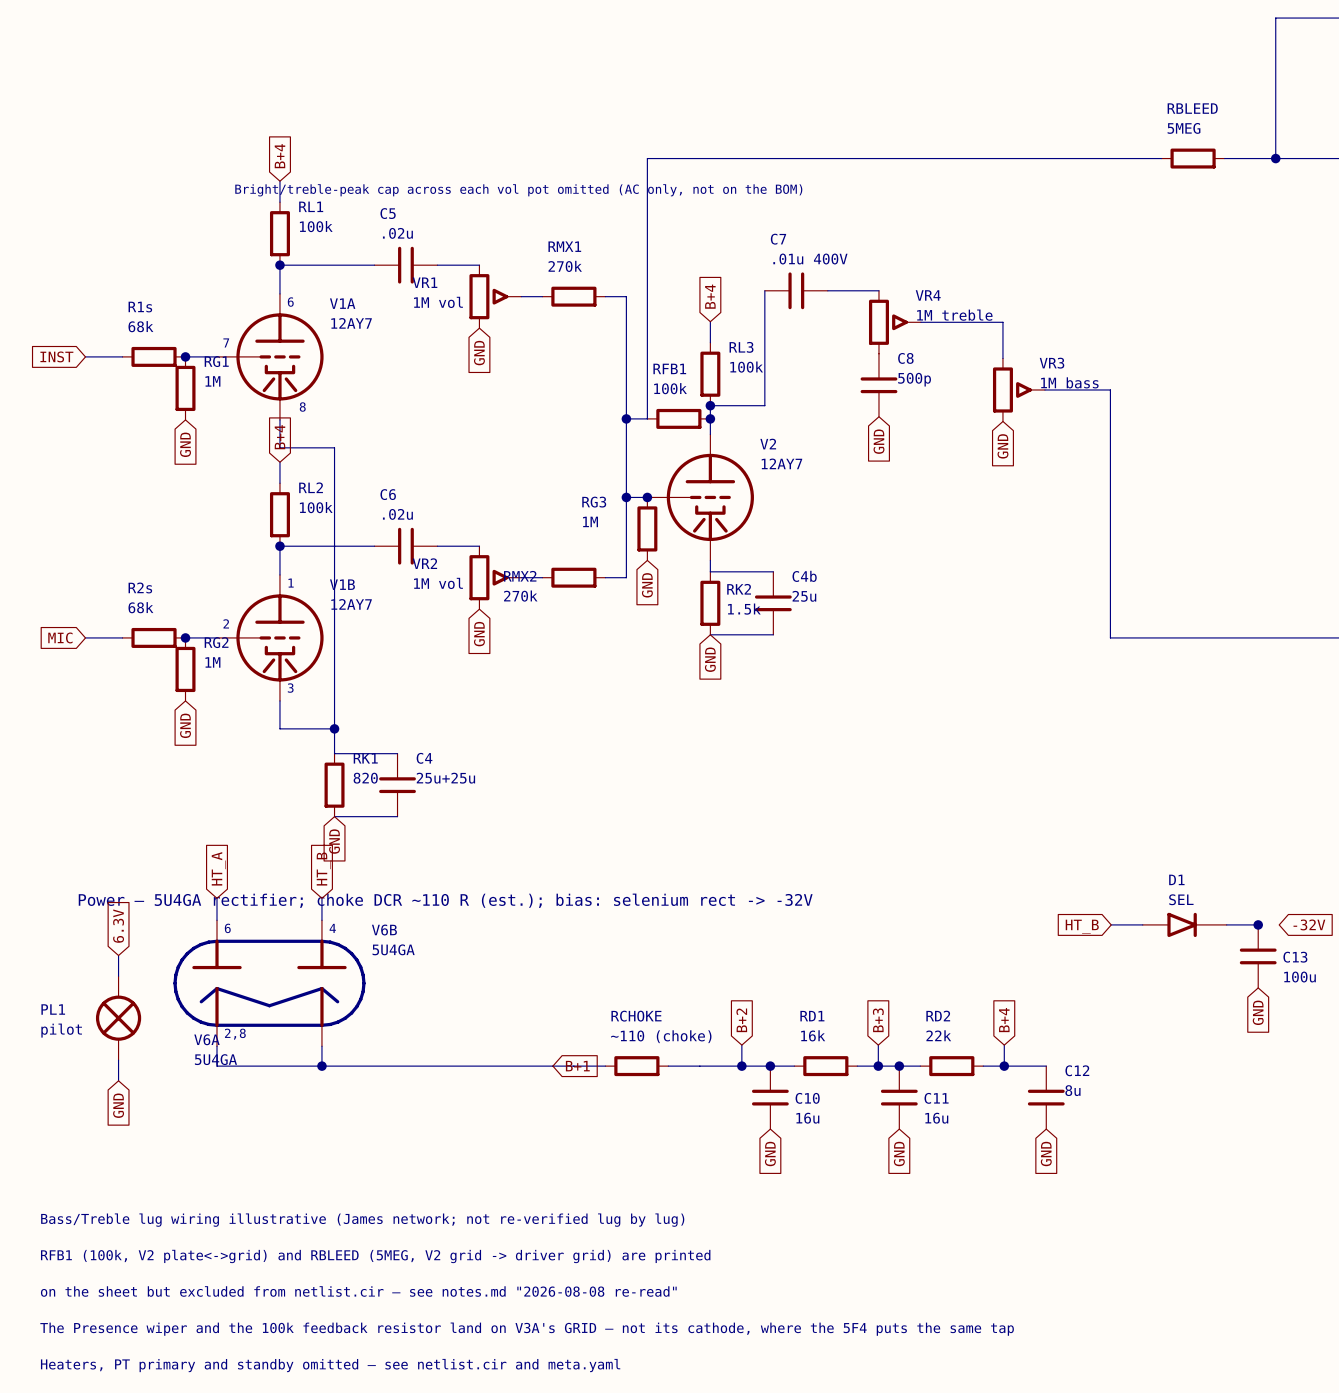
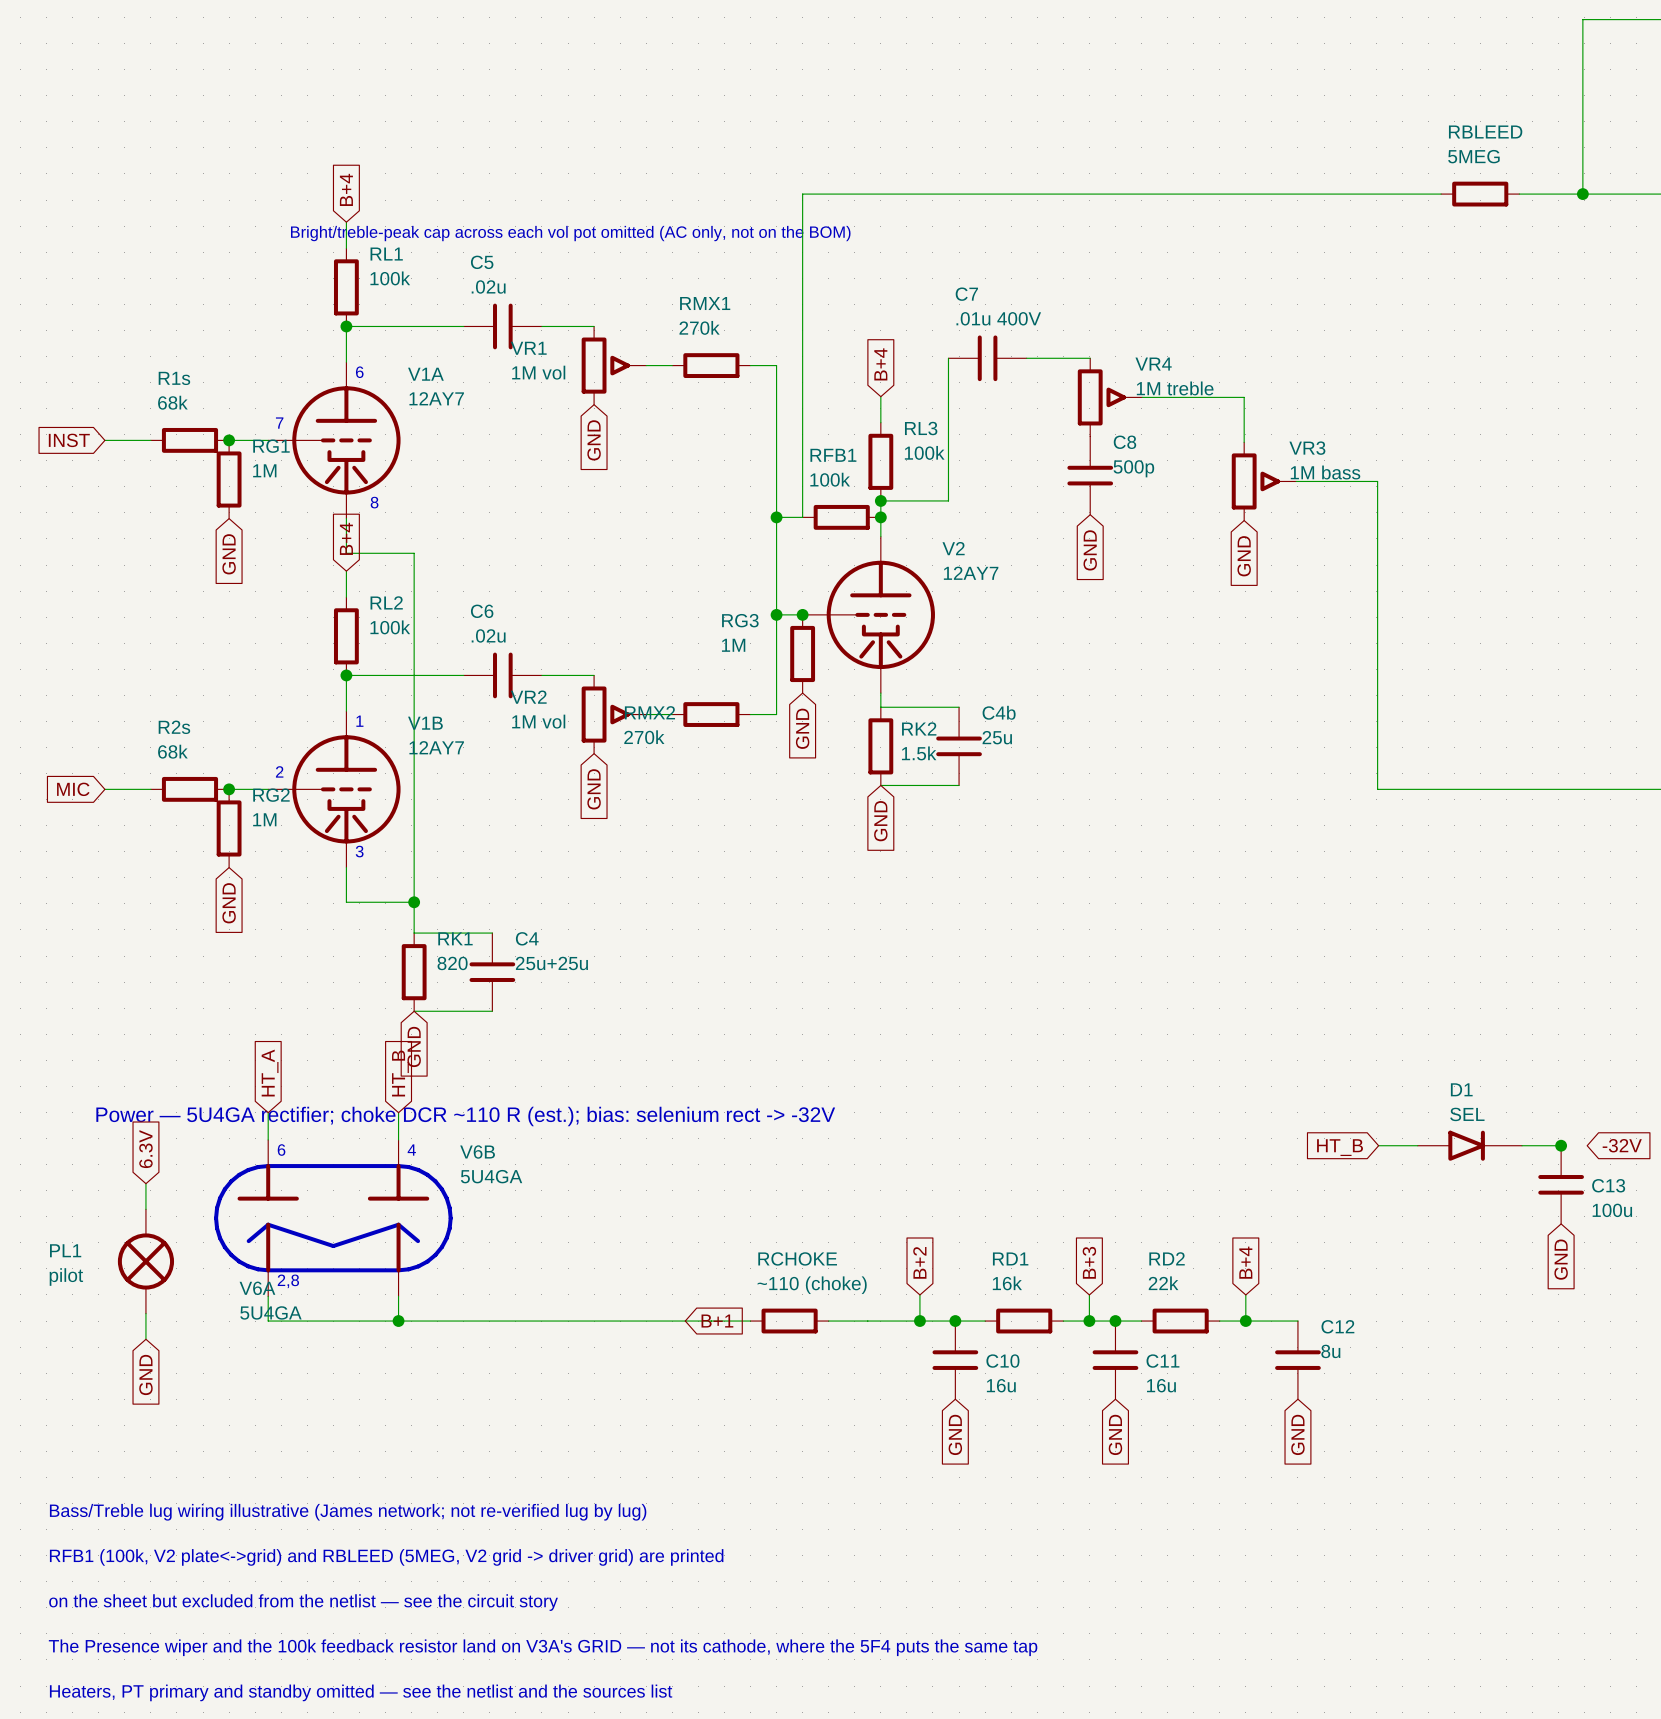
text: on the sheet but excluded from netlist.cir — see notes.md "2026-08-08 re-read" (358, 1291) -> on the sheet but excluded from the netlist — see the circuit story (303, 1602)
text: Heaters, PT primary and standby omitted — see netlist.cir and meta.yaml (330, 1365) -> Heaters, PT primary and standby omitted — see the netlist and the sources list (361, 1692)

